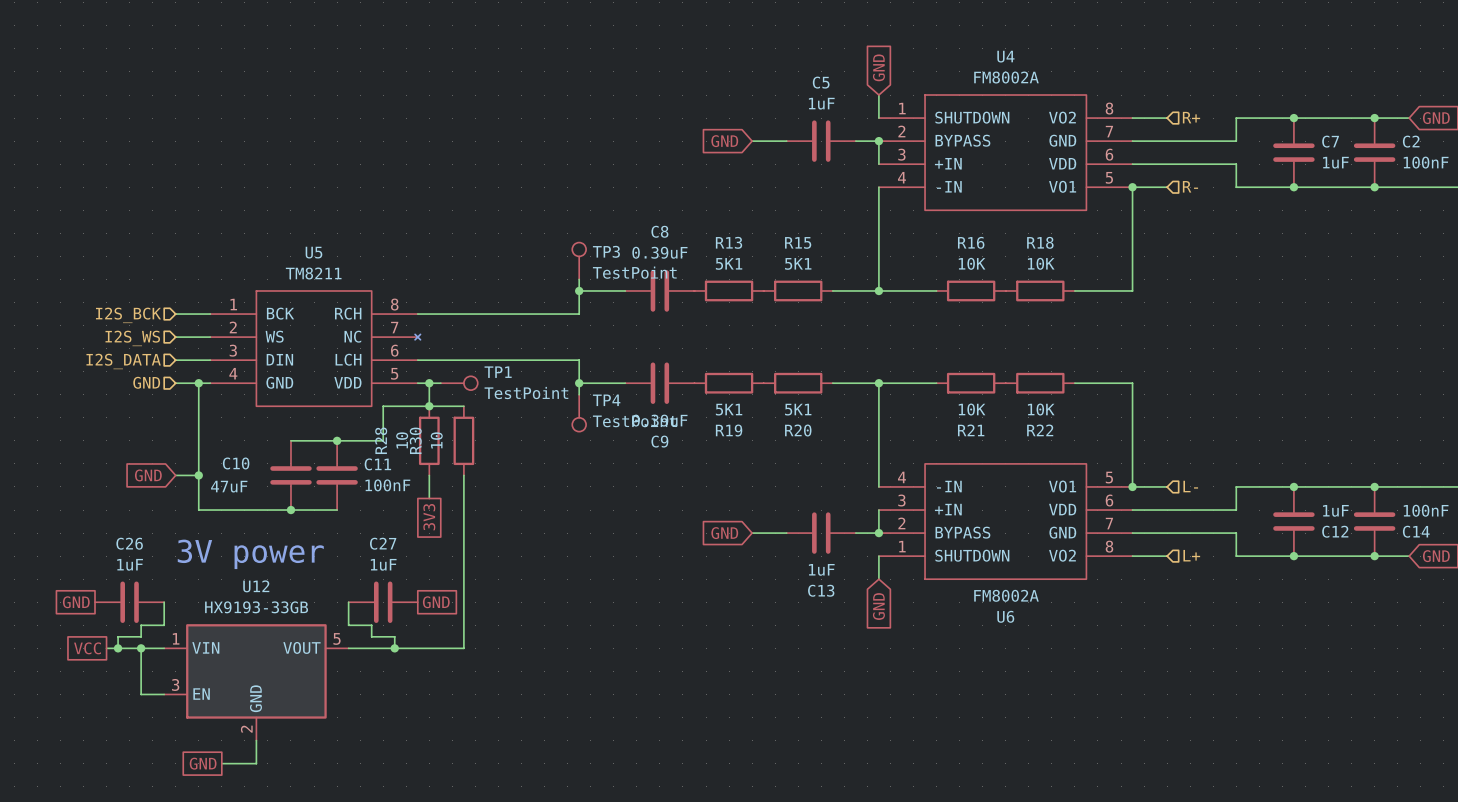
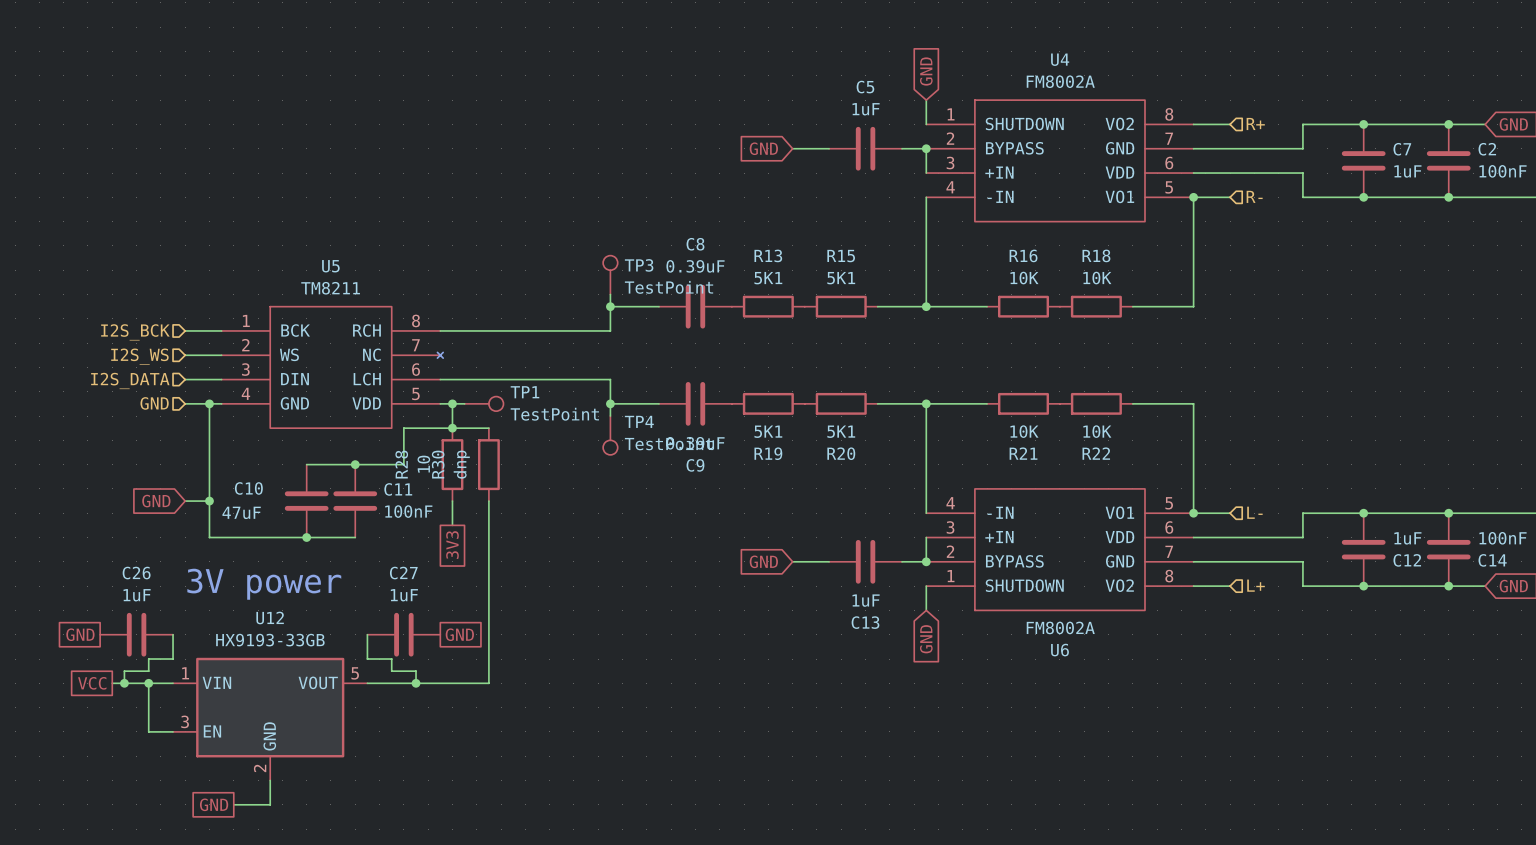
R30 value: 10 (436, 440) -> dnp (461, 464)

